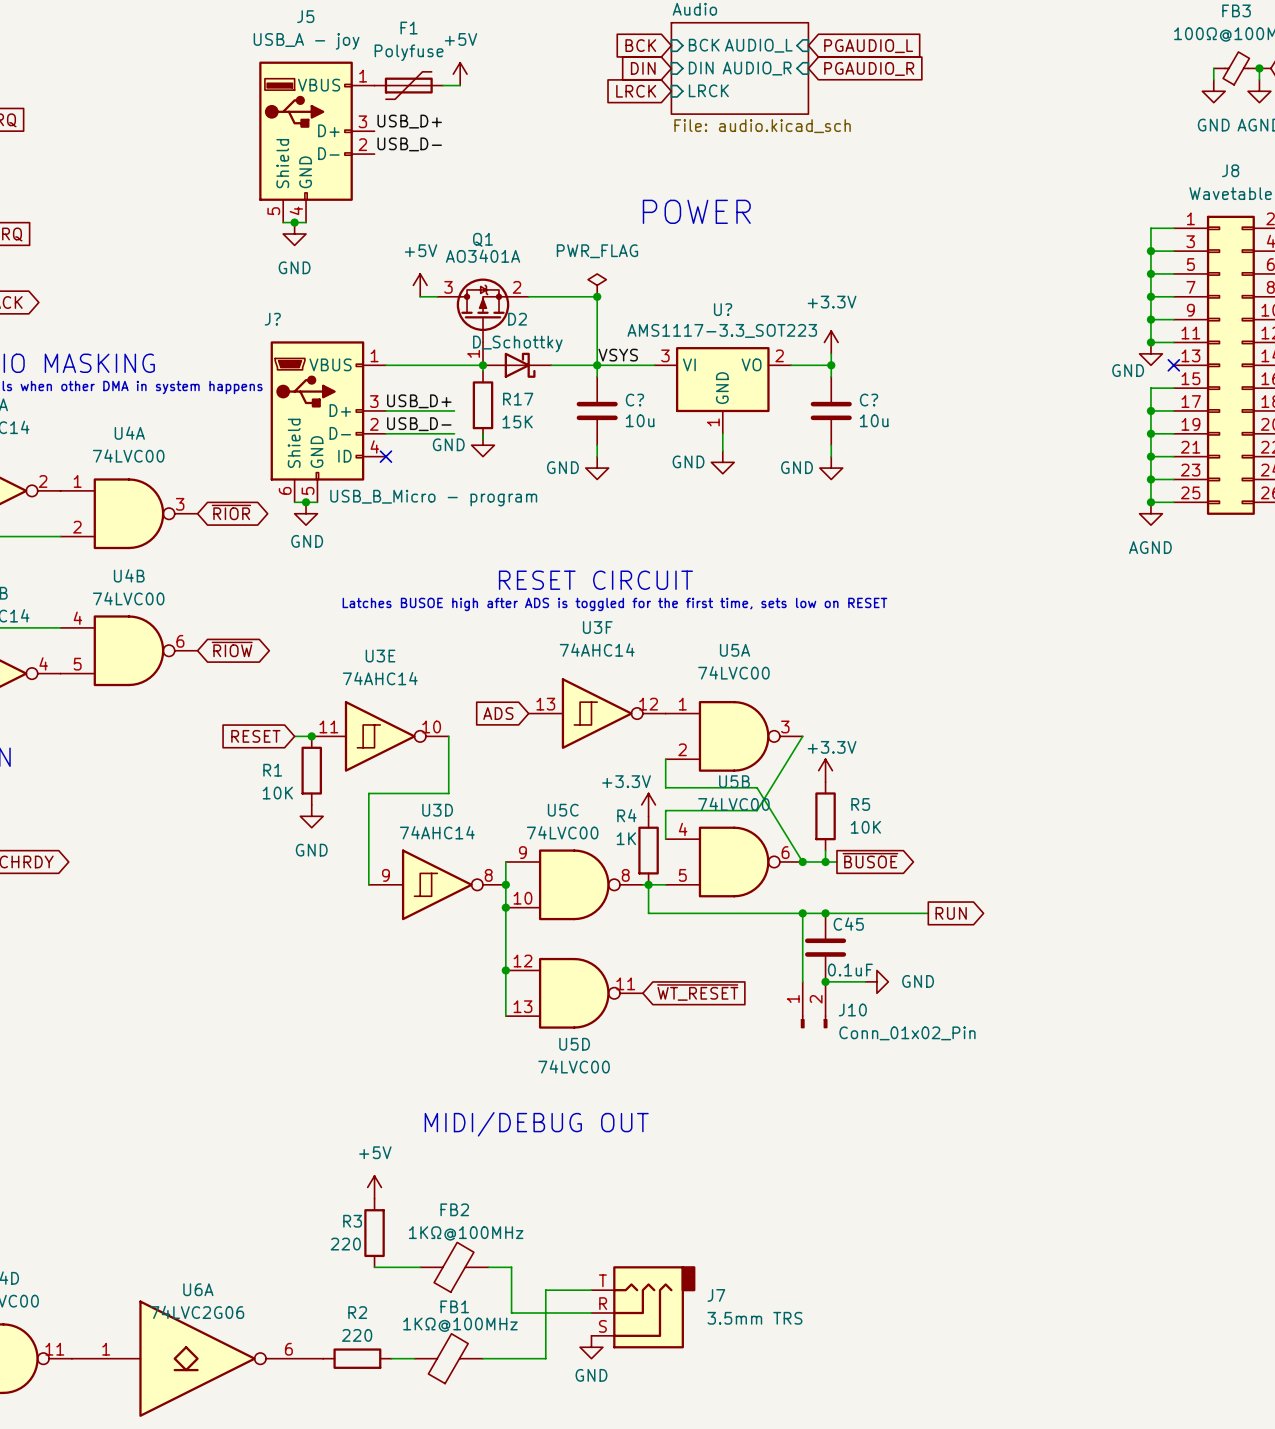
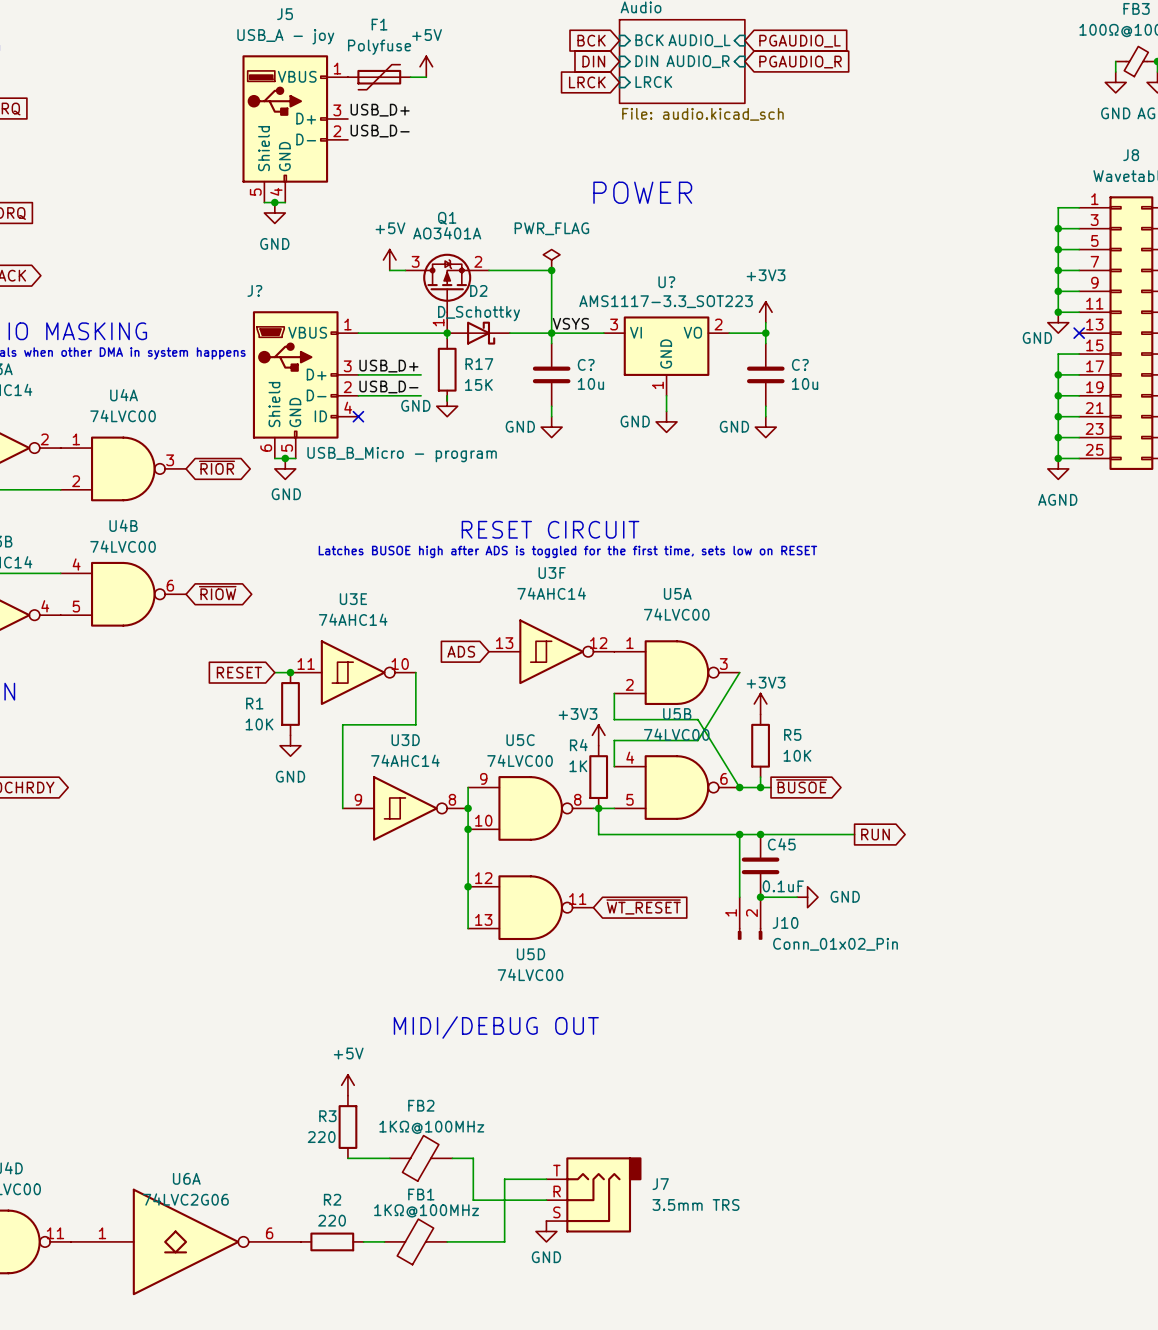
power symbol: +3.3V (831, 342) -> +3V3 (765, 312)
power symbol: +3.3V (825, 770) -> +3V3 (760, 703)
power symbol: +3.3V (648, 804) -> +3V3 (598, 735)

